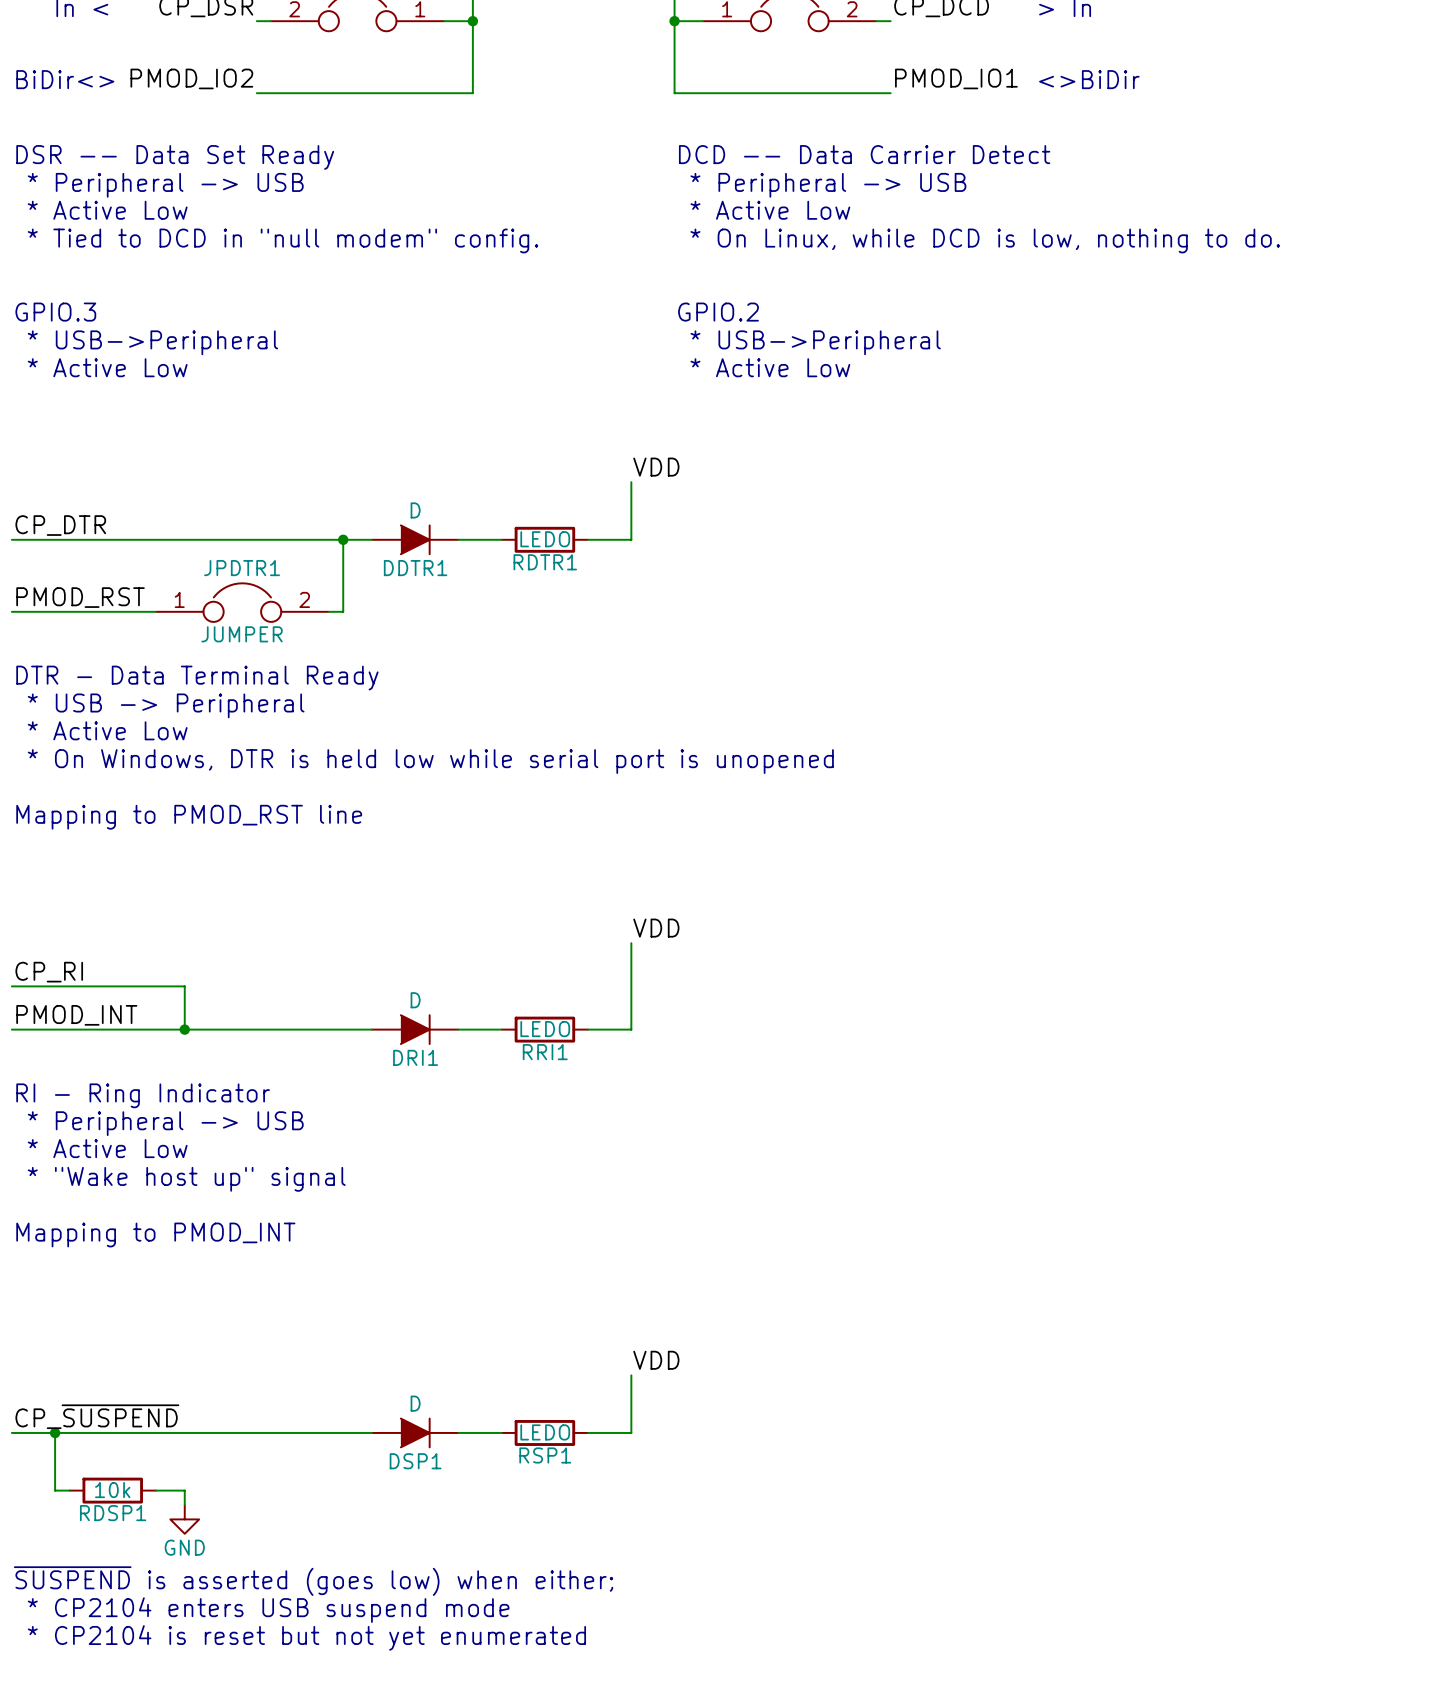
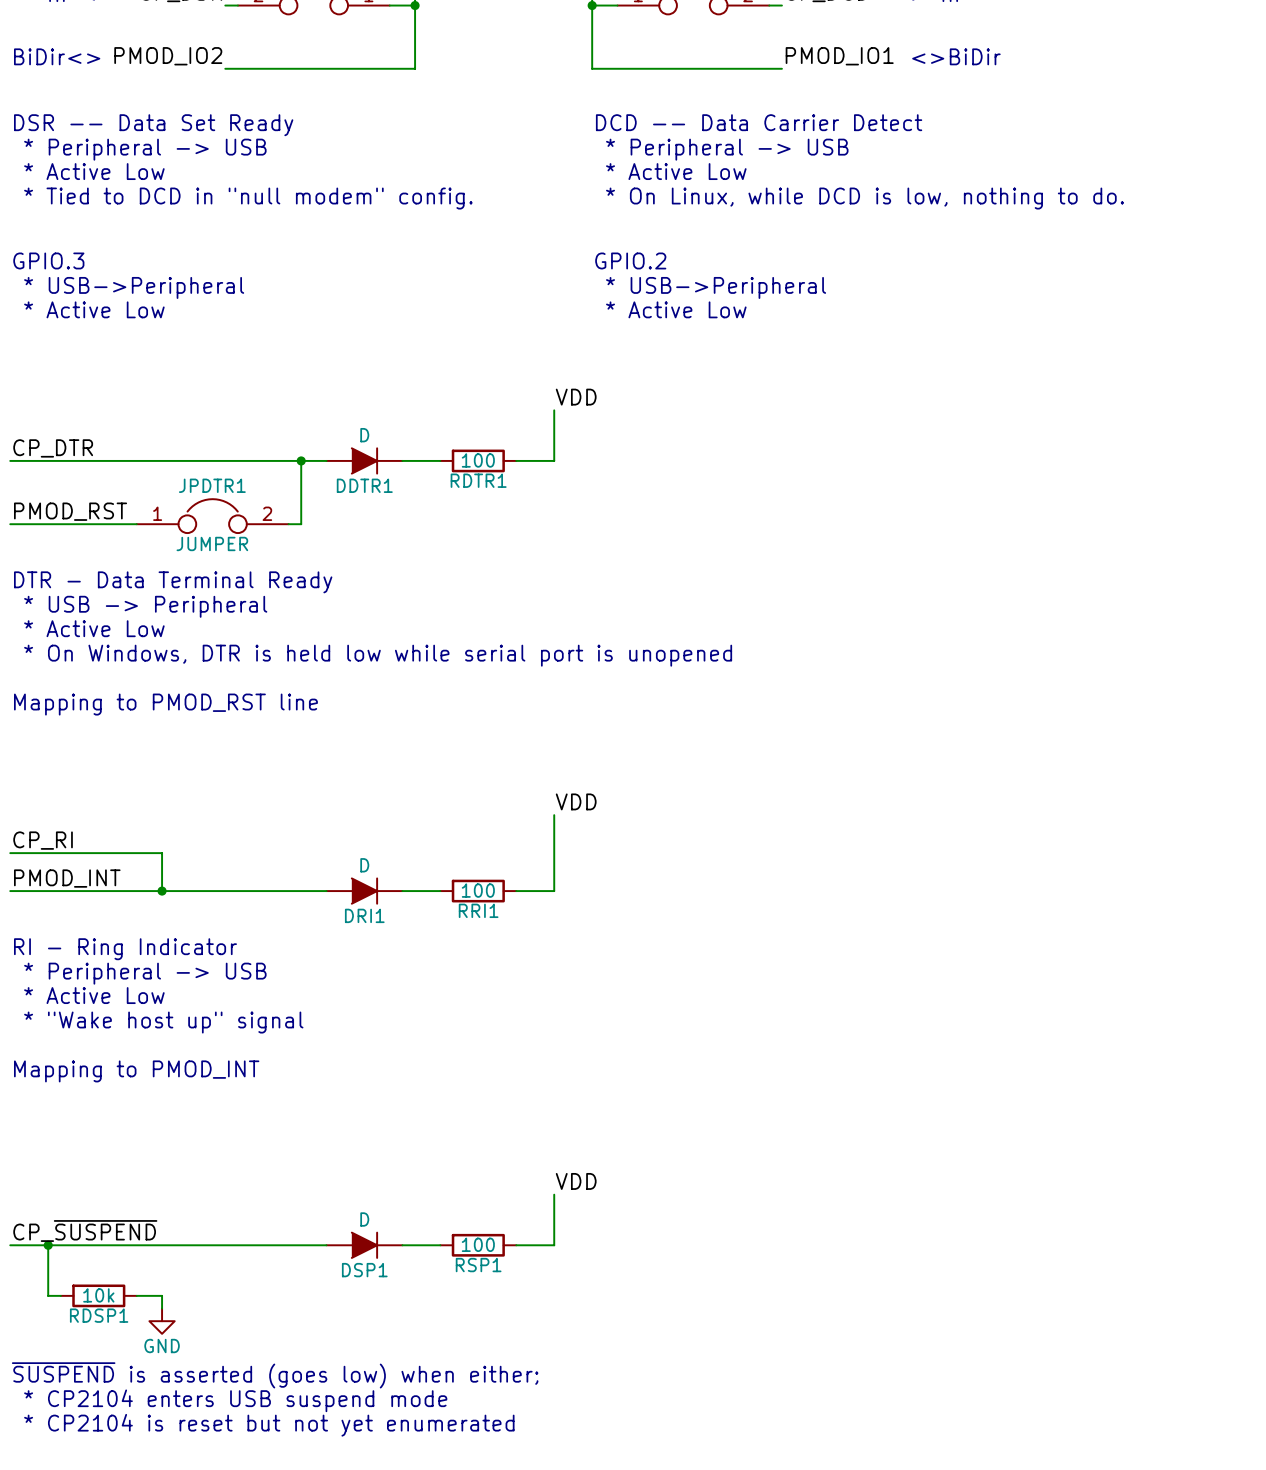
RDTR1 value: LEDO (545, 539) -> 100 (478, 460)
RRI1 value: LEDO (545, 1029) -> 100 (478, 890)
RSP1 value: LEDO (545, 1432) -> 100 (478, 1244)

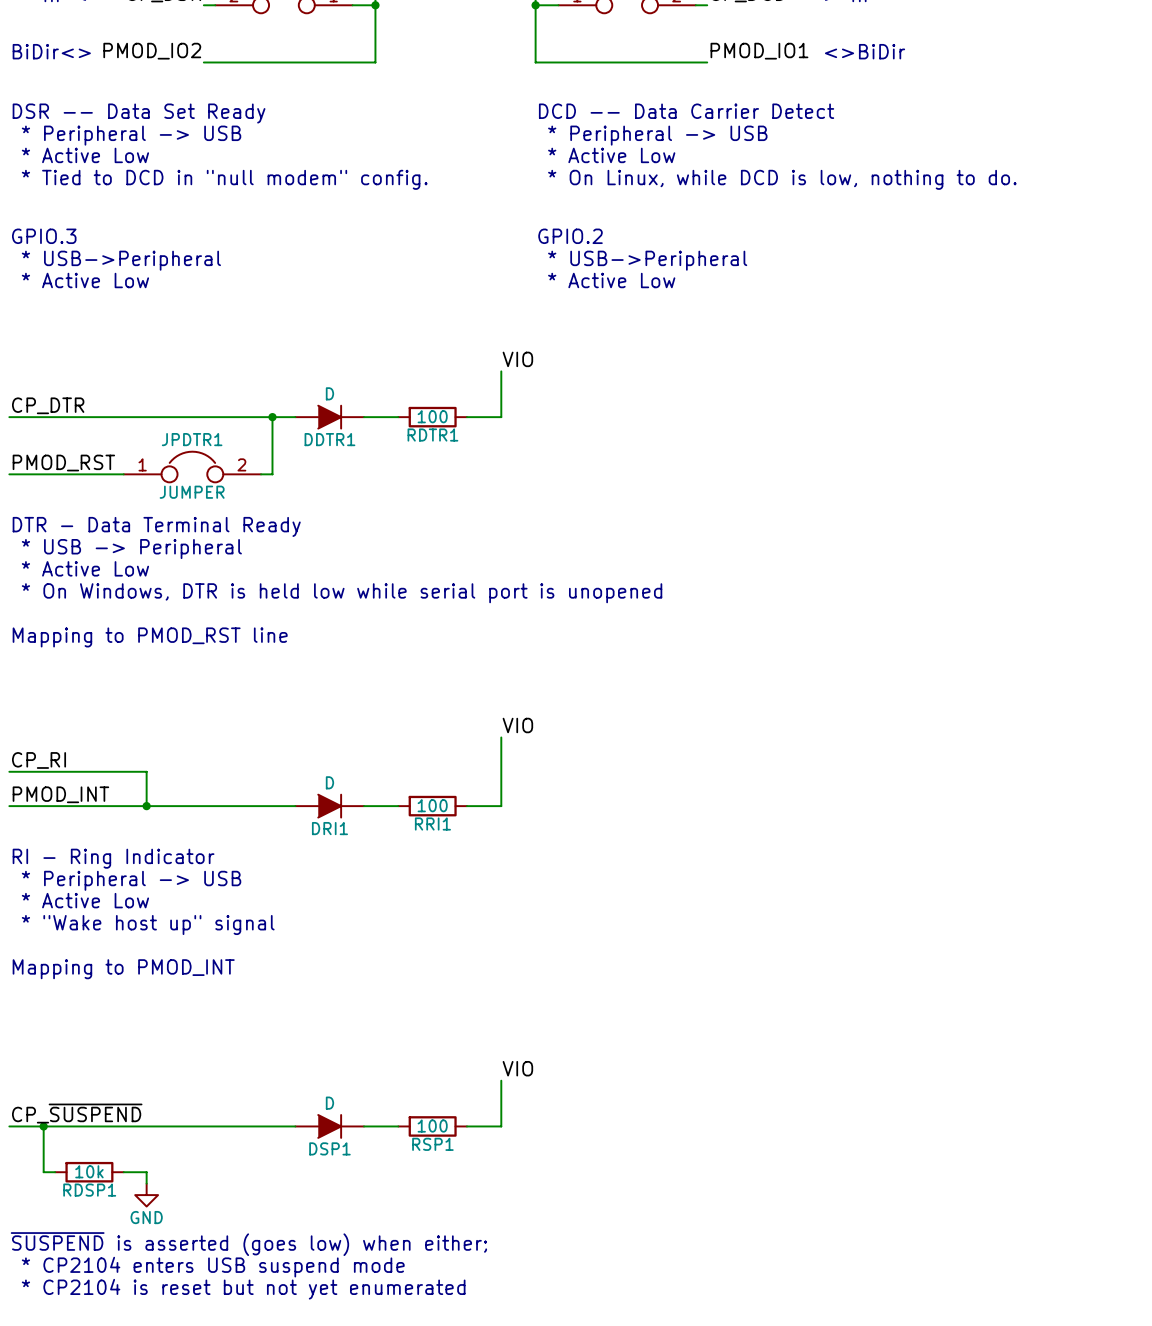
label: VDD (576, 397) -> VIO (517, 359)
label: VDD (576, 801) -> VIO (517, 725)
label: VDD (576, 1181) -> VIO (517, 1068)

